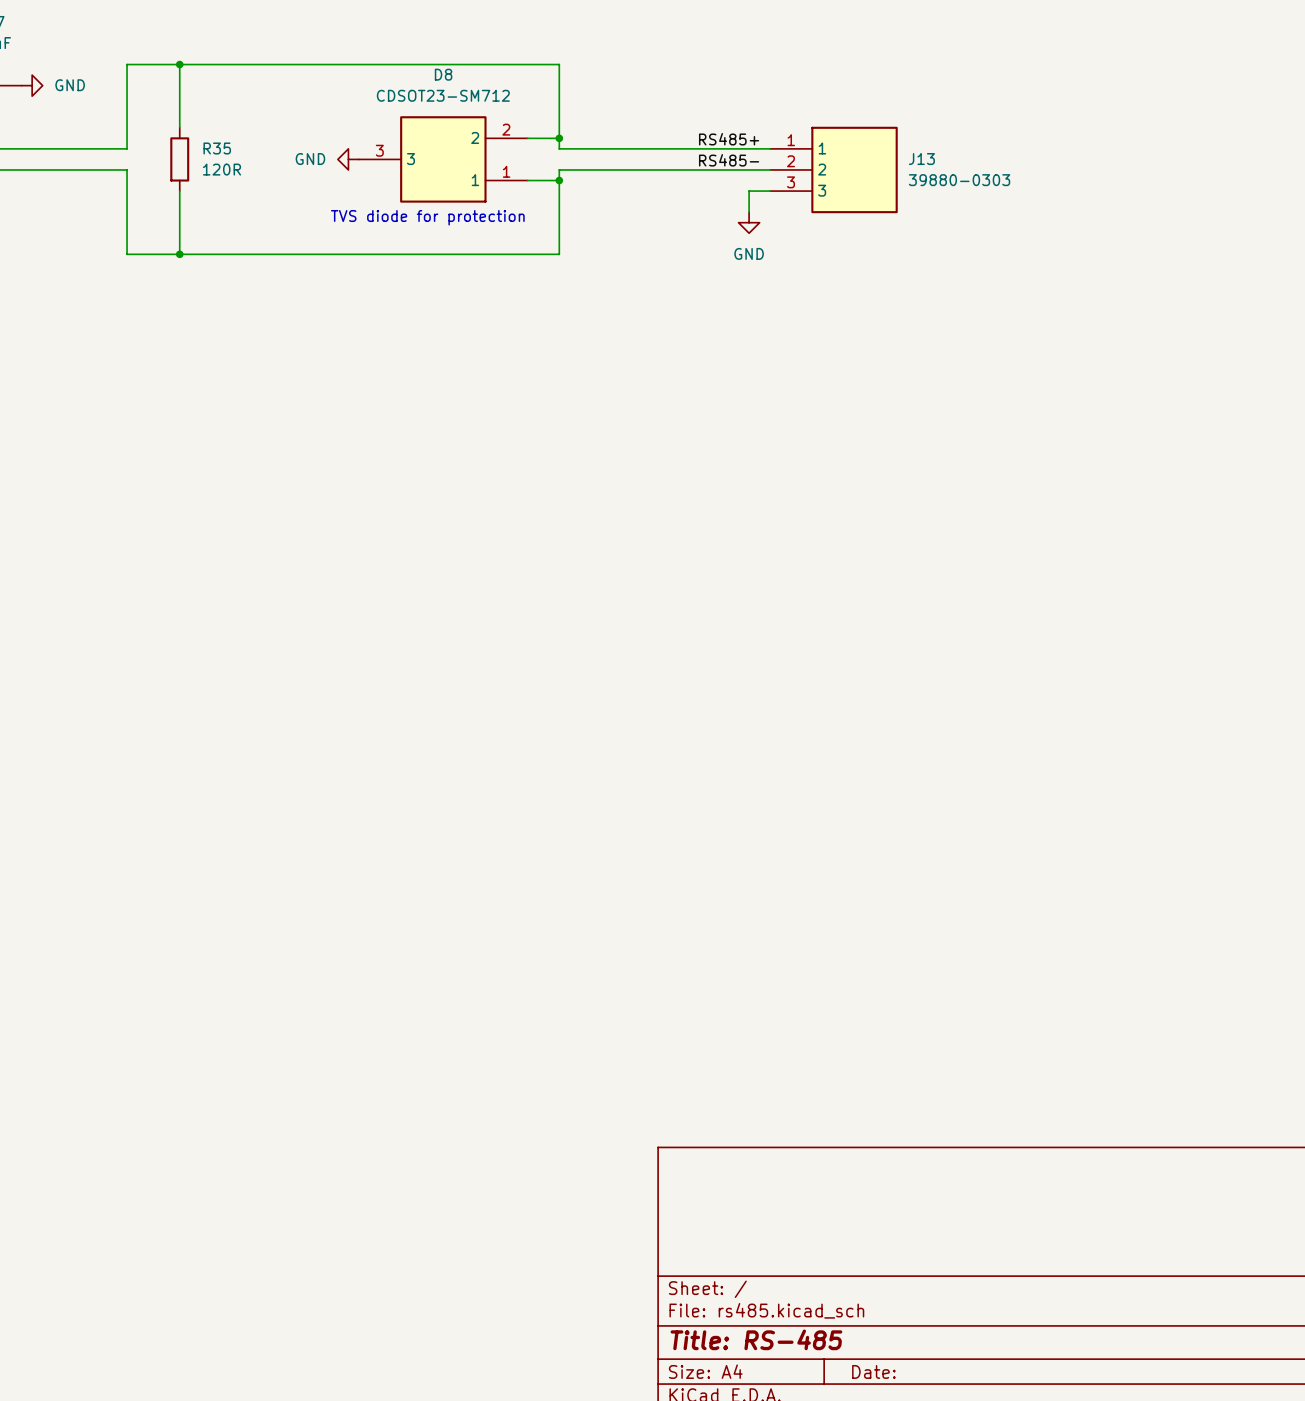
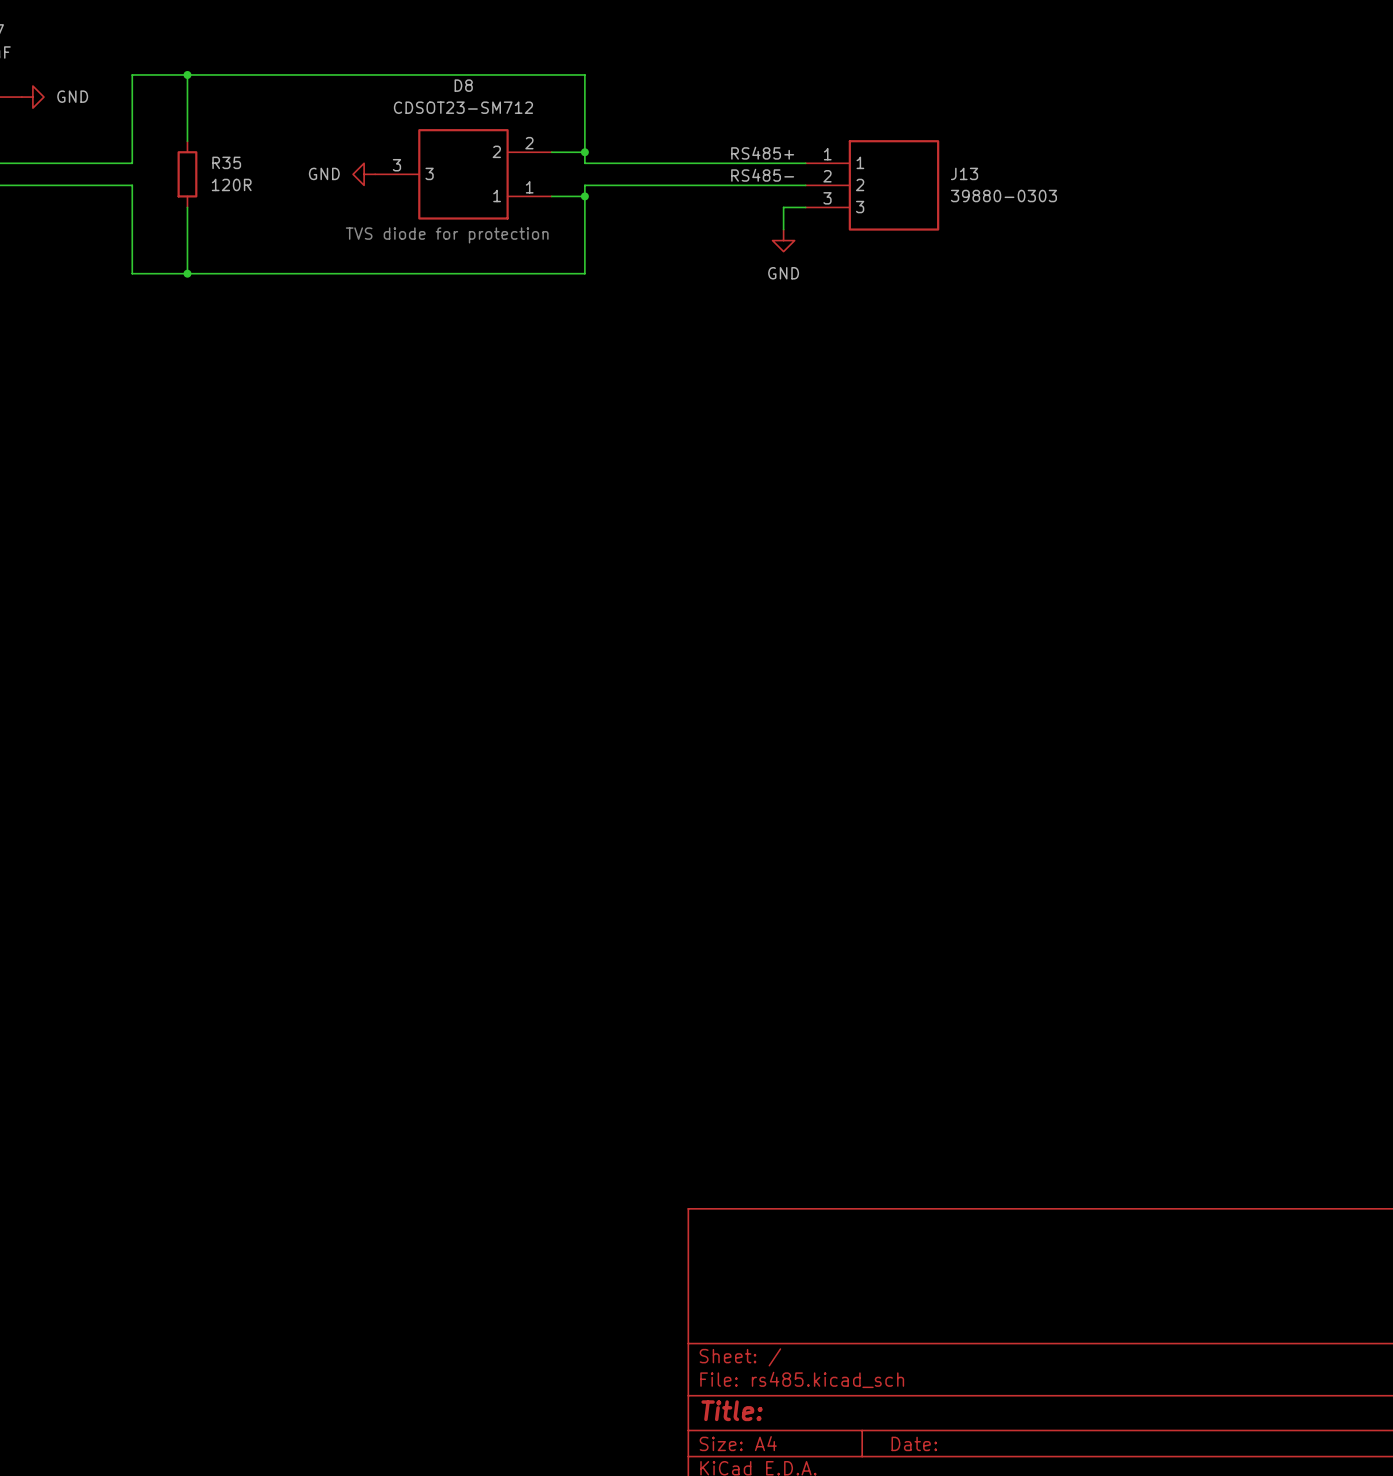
title block: Title: RS-485 (756, 1339) -> Title: (732, 1410)

